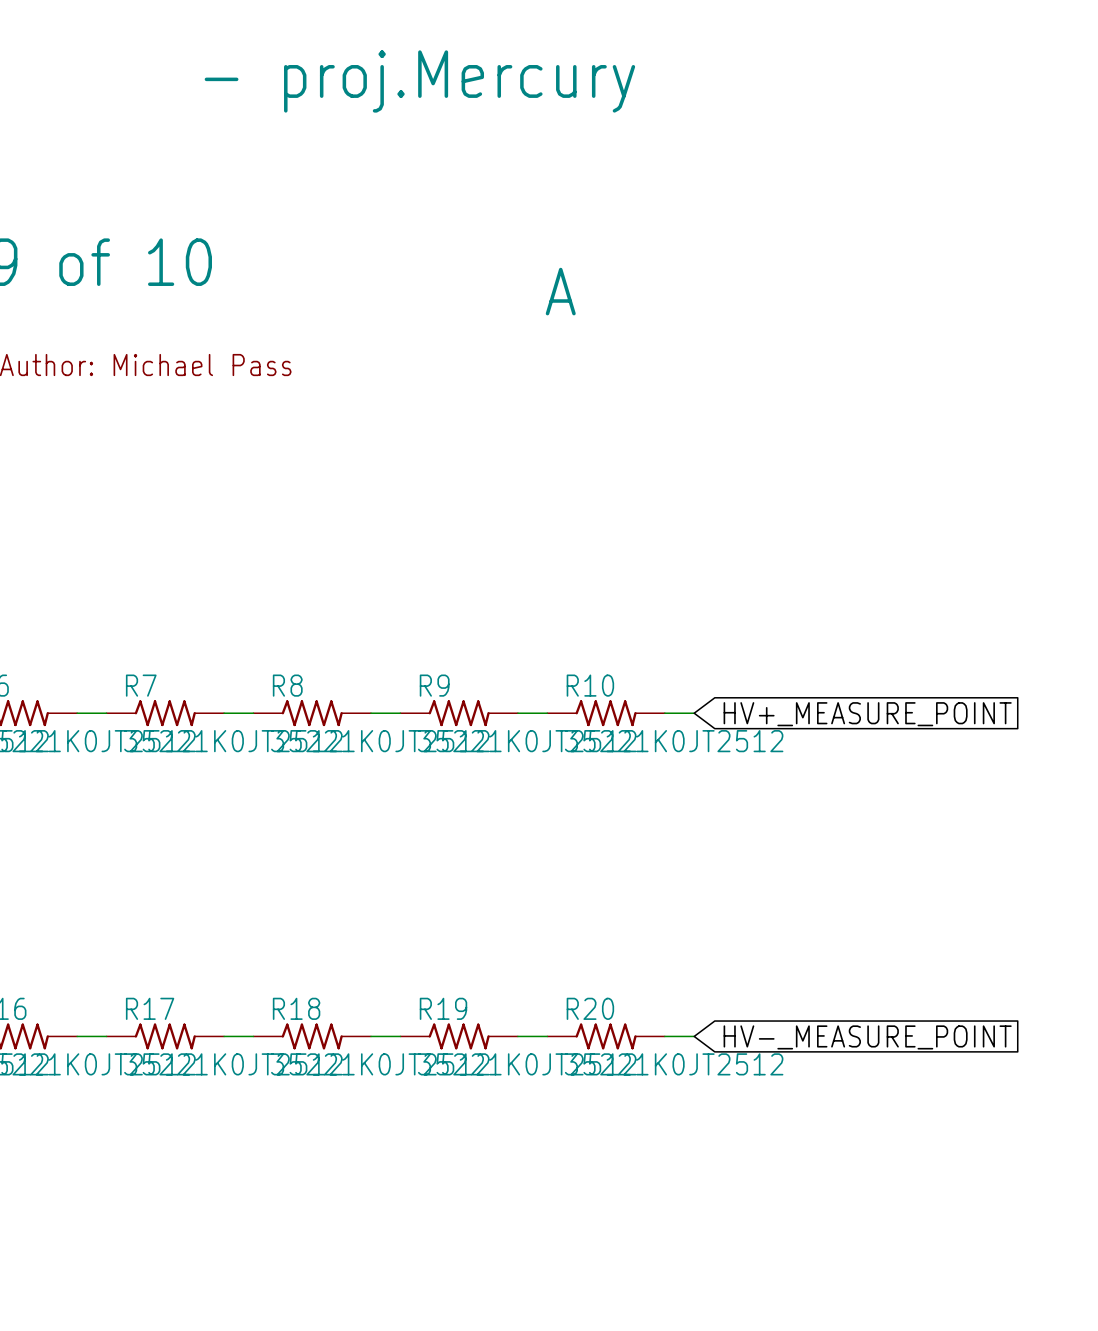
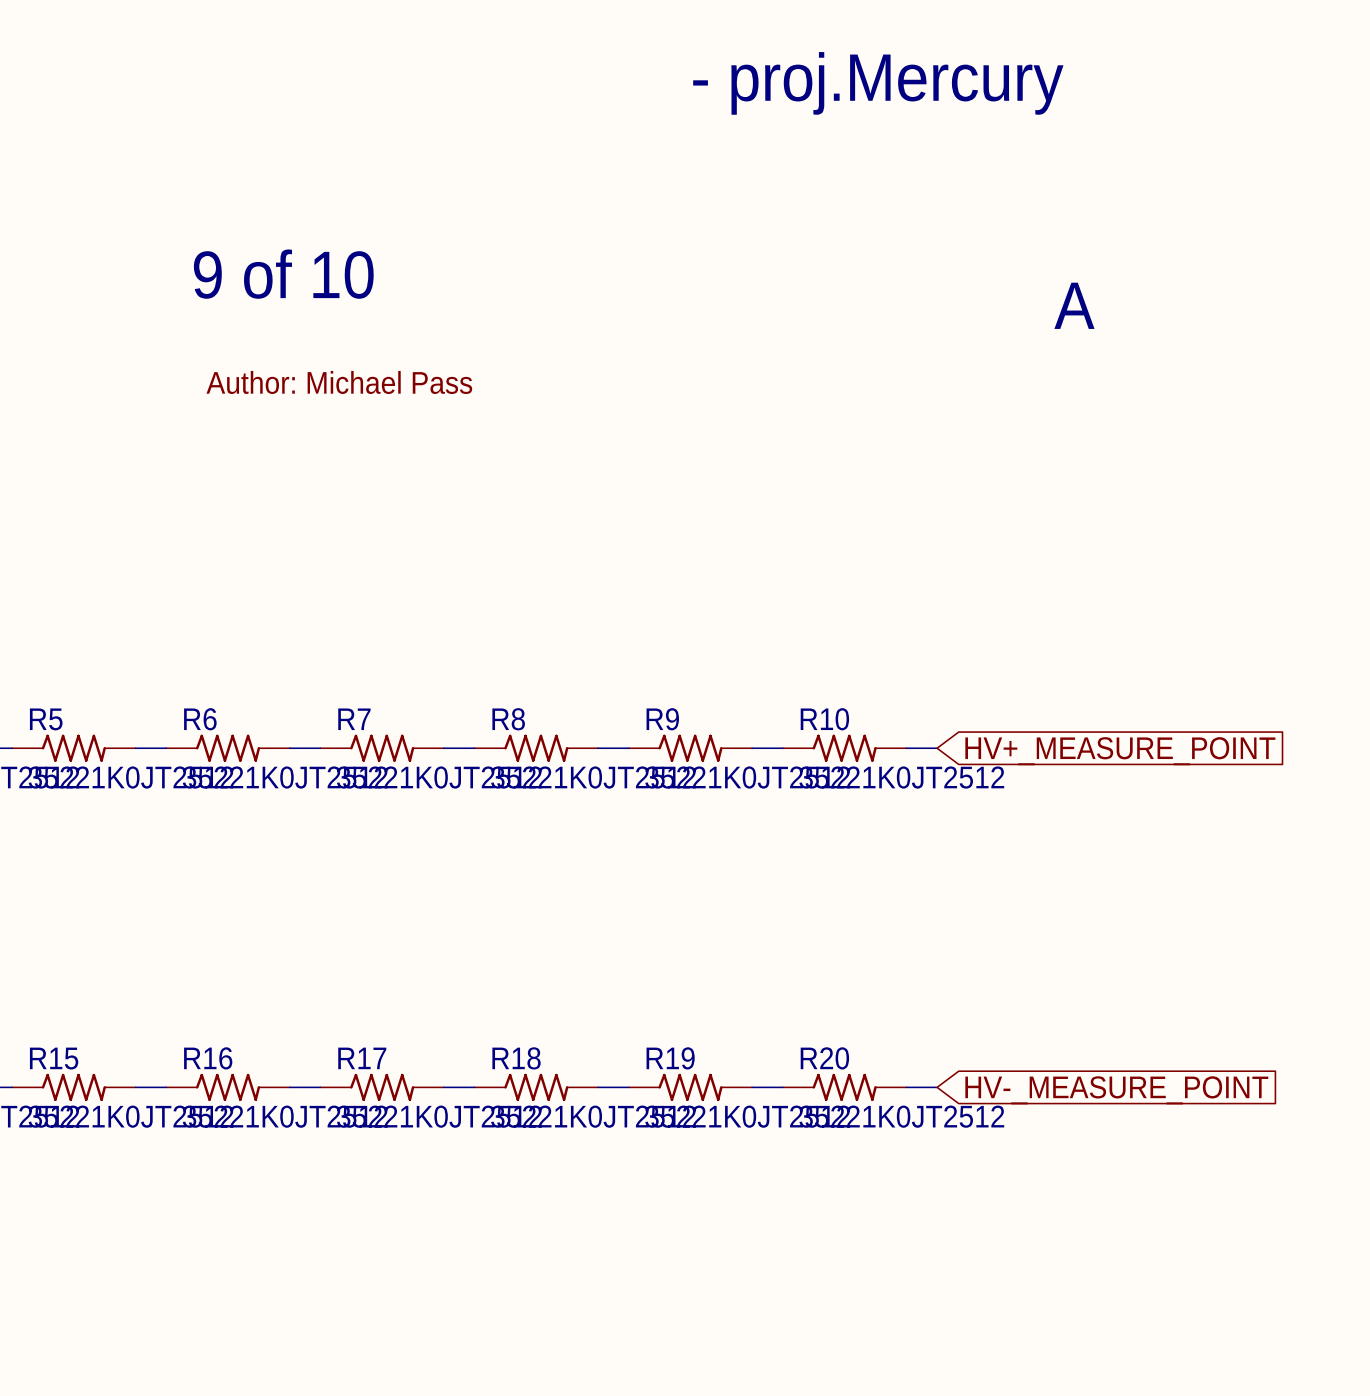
text position: - proj.Mercury (419, 81) -> - proj.Mercury (878, 83)
text position: A (560, 291) -> A (1074, 305)

